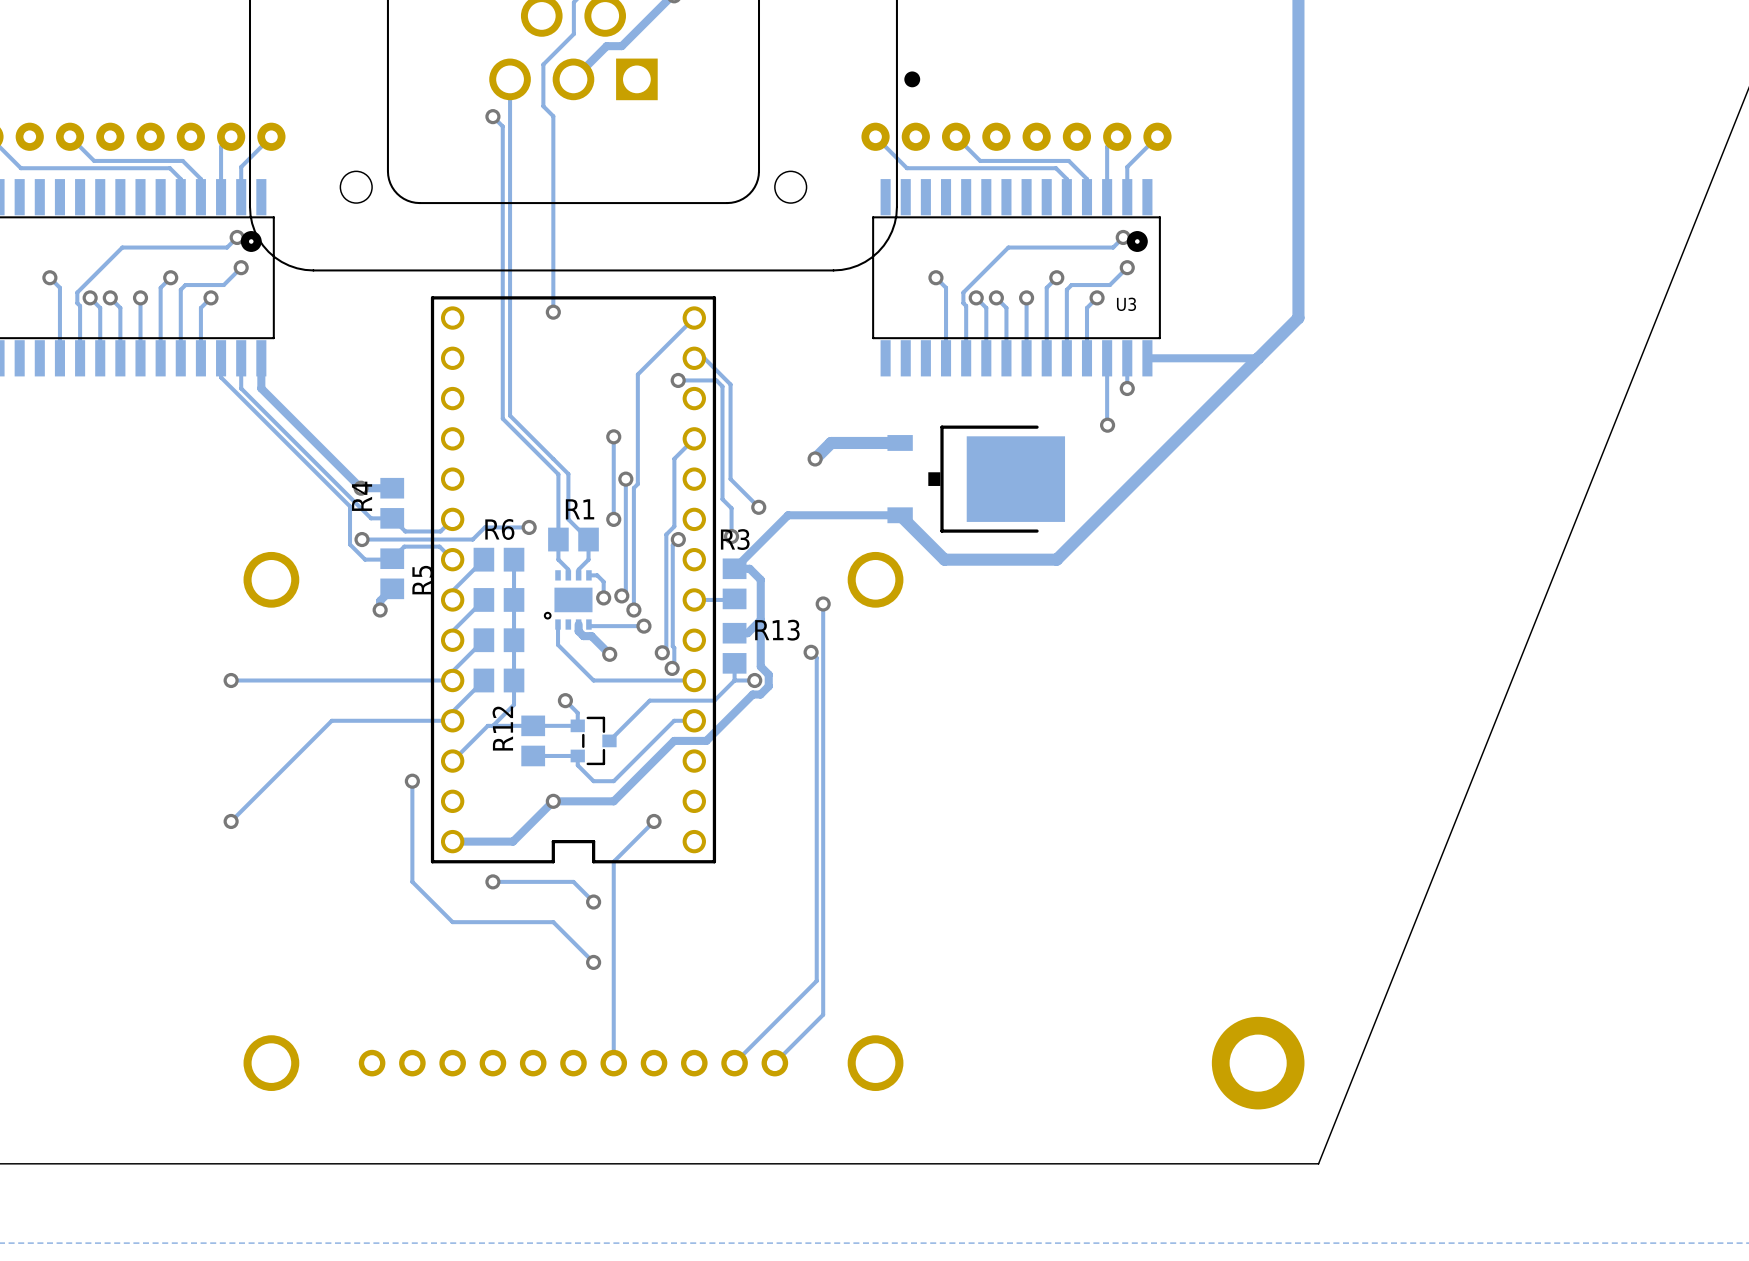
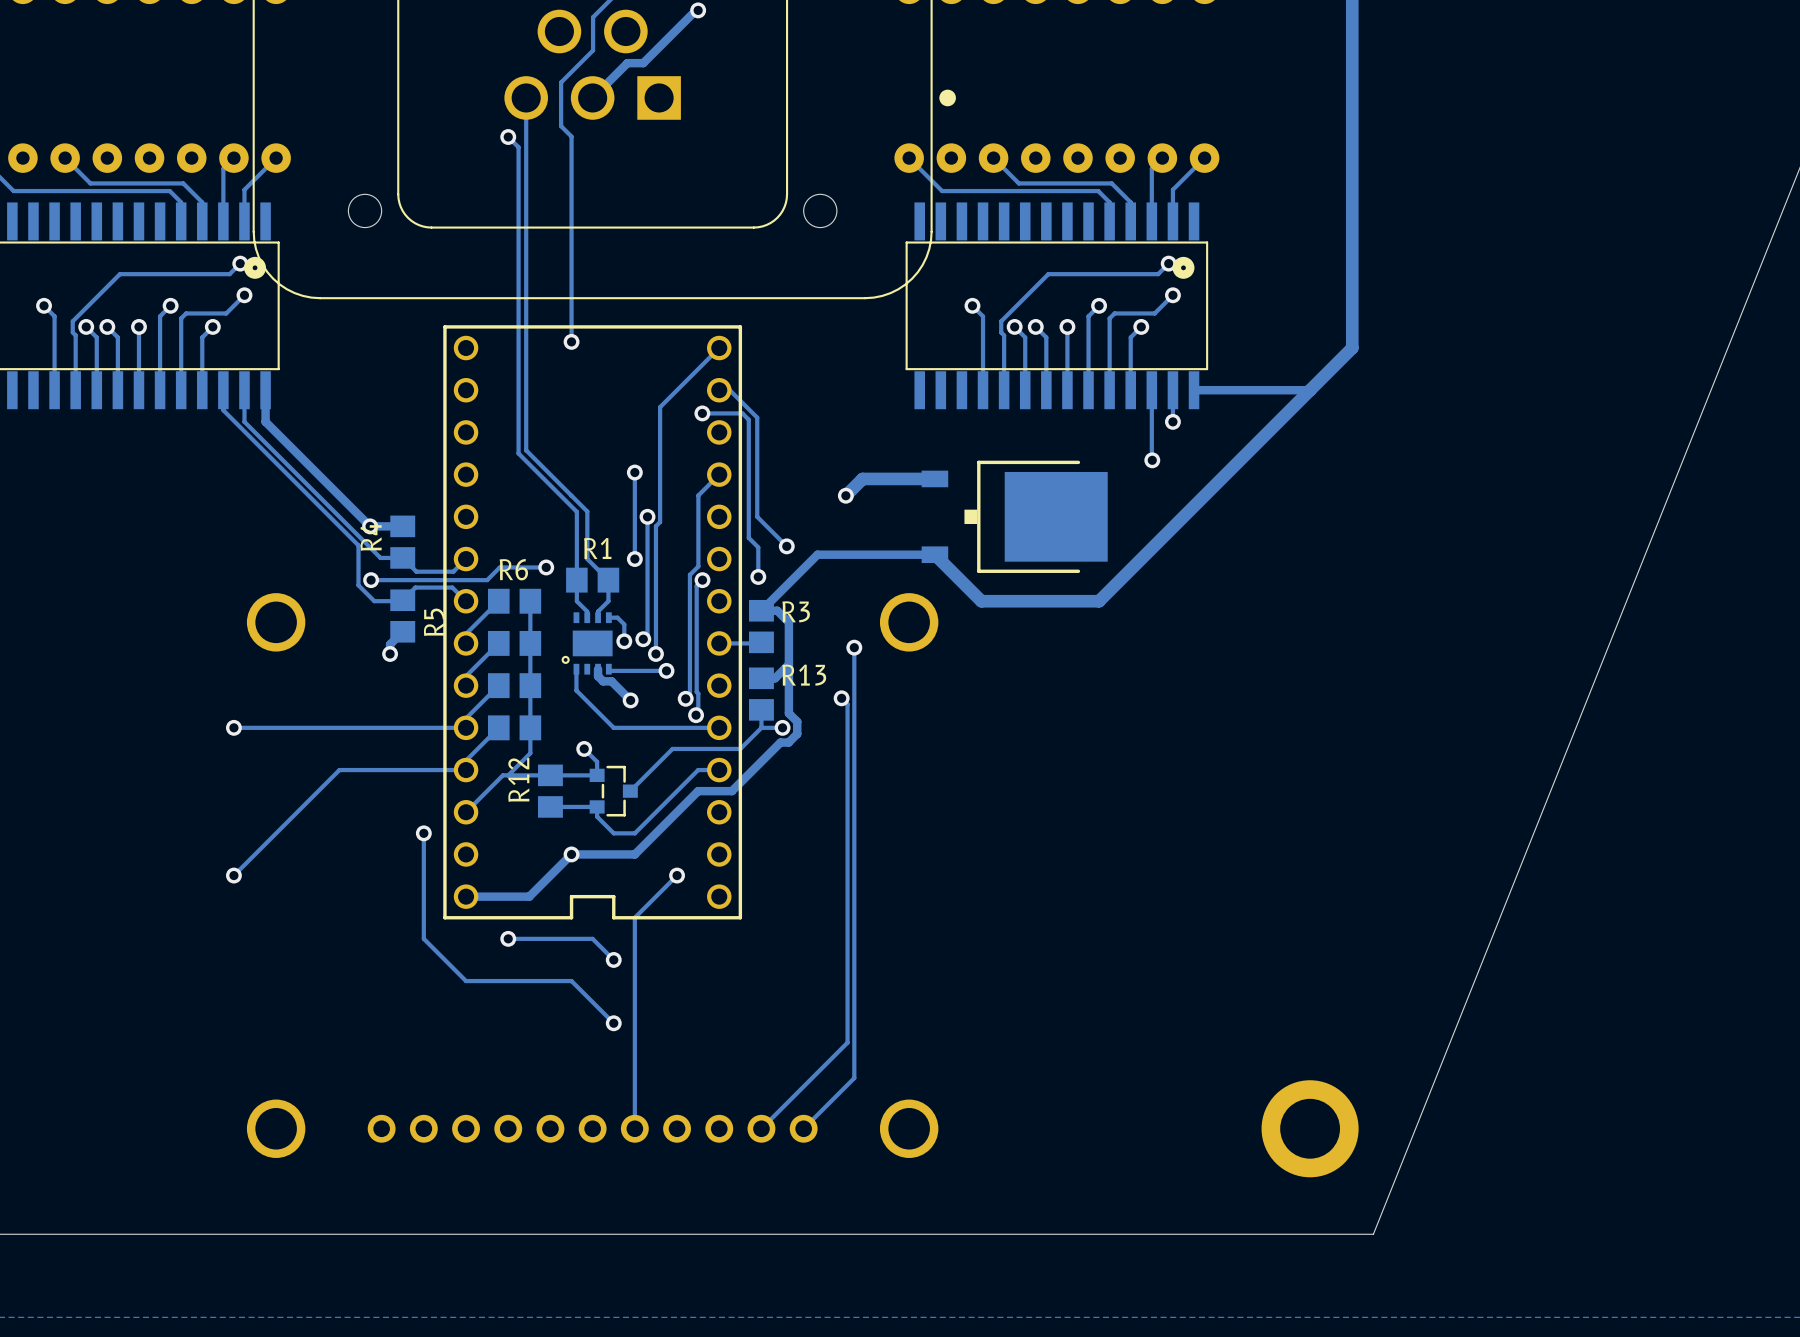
U3 name: U3 (1126, 304) -> none
R3 name position: R3 (735, 539) -> R3 (796, 611)

